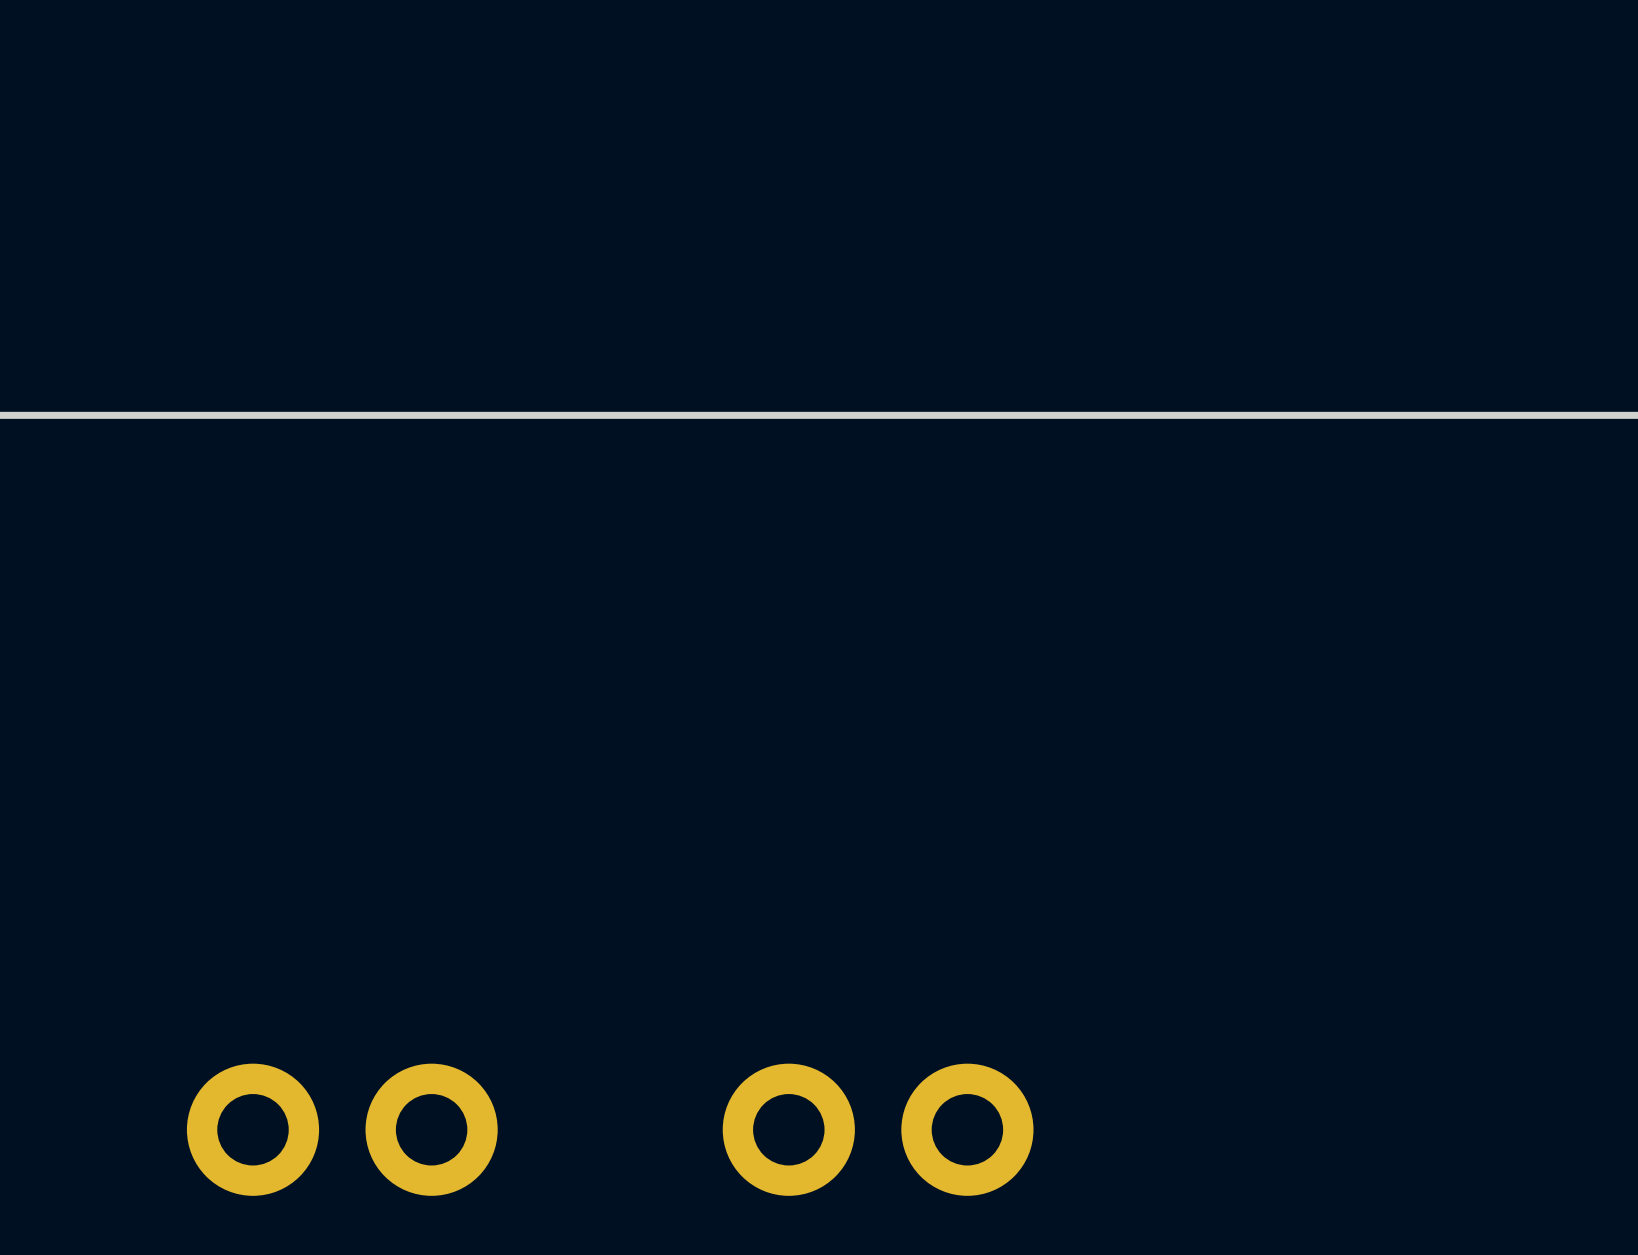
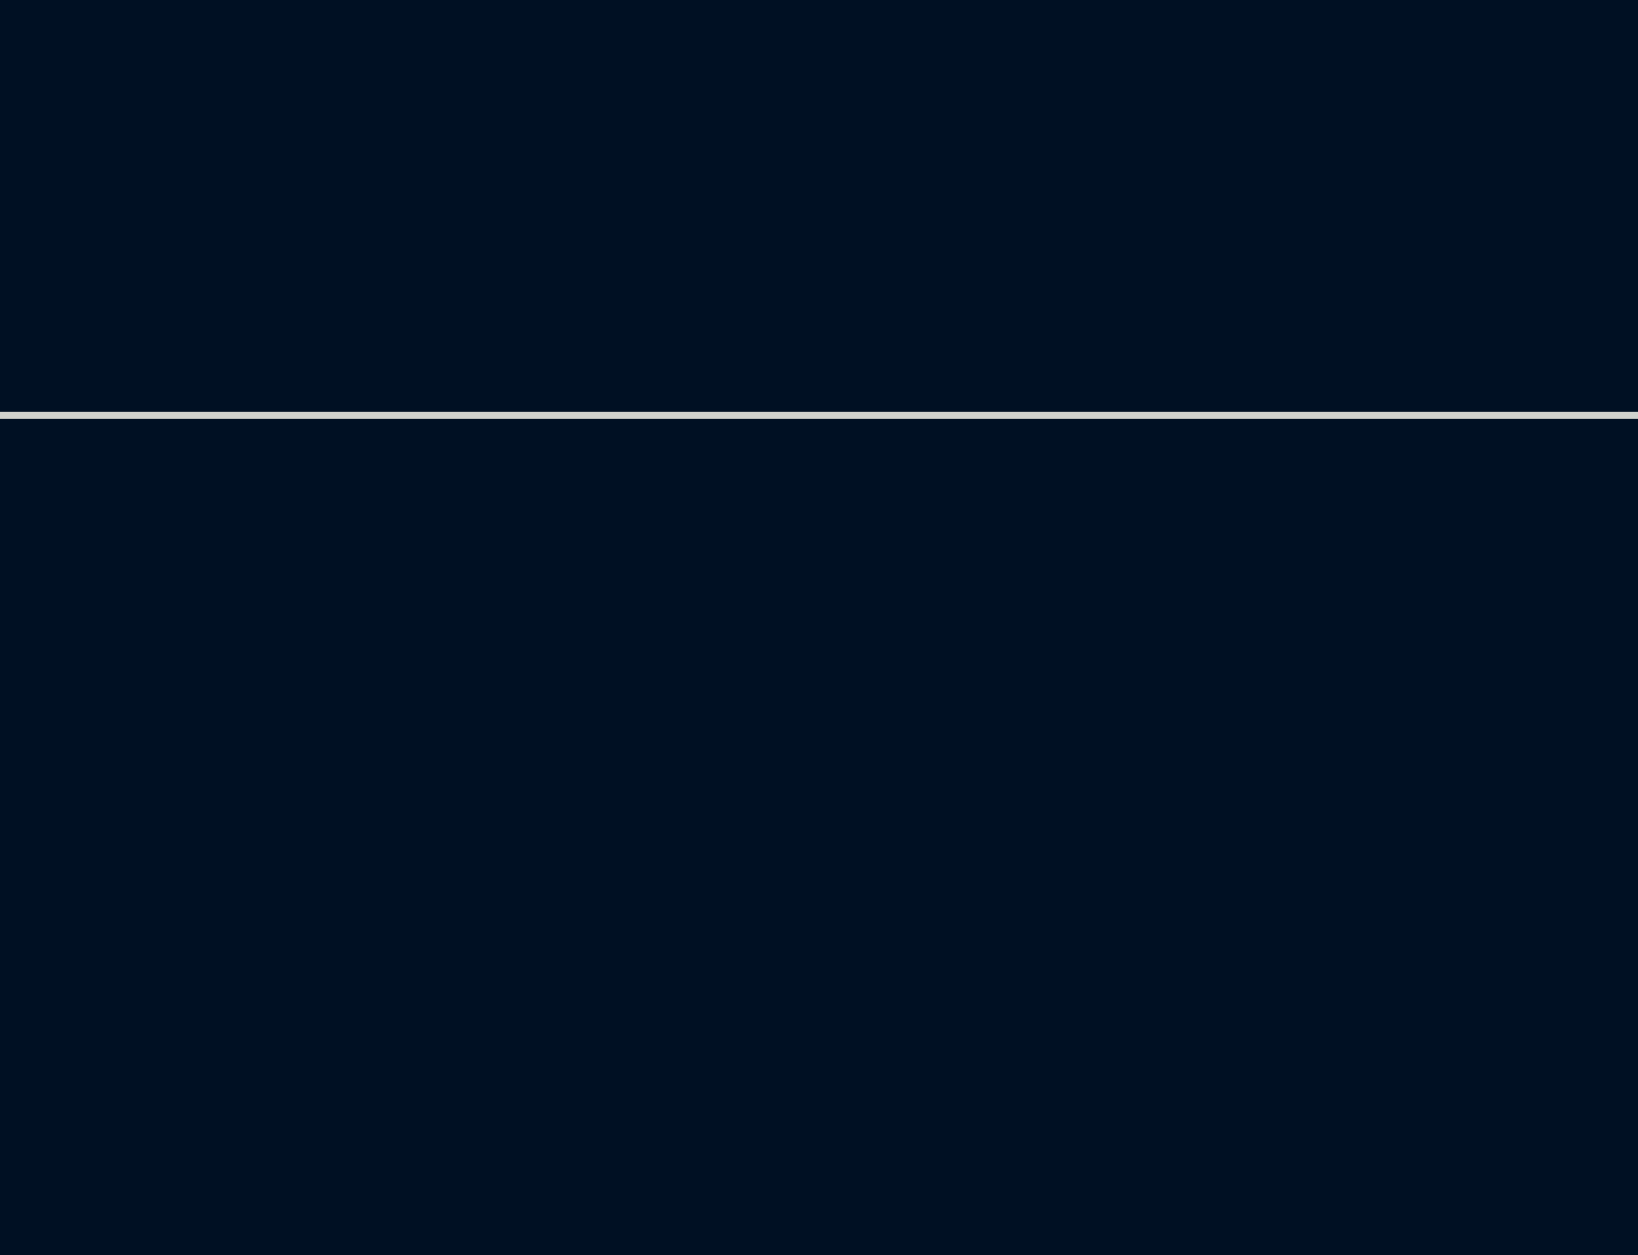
part: (342, 1129) -> none
part: (878, 1129) -> none

